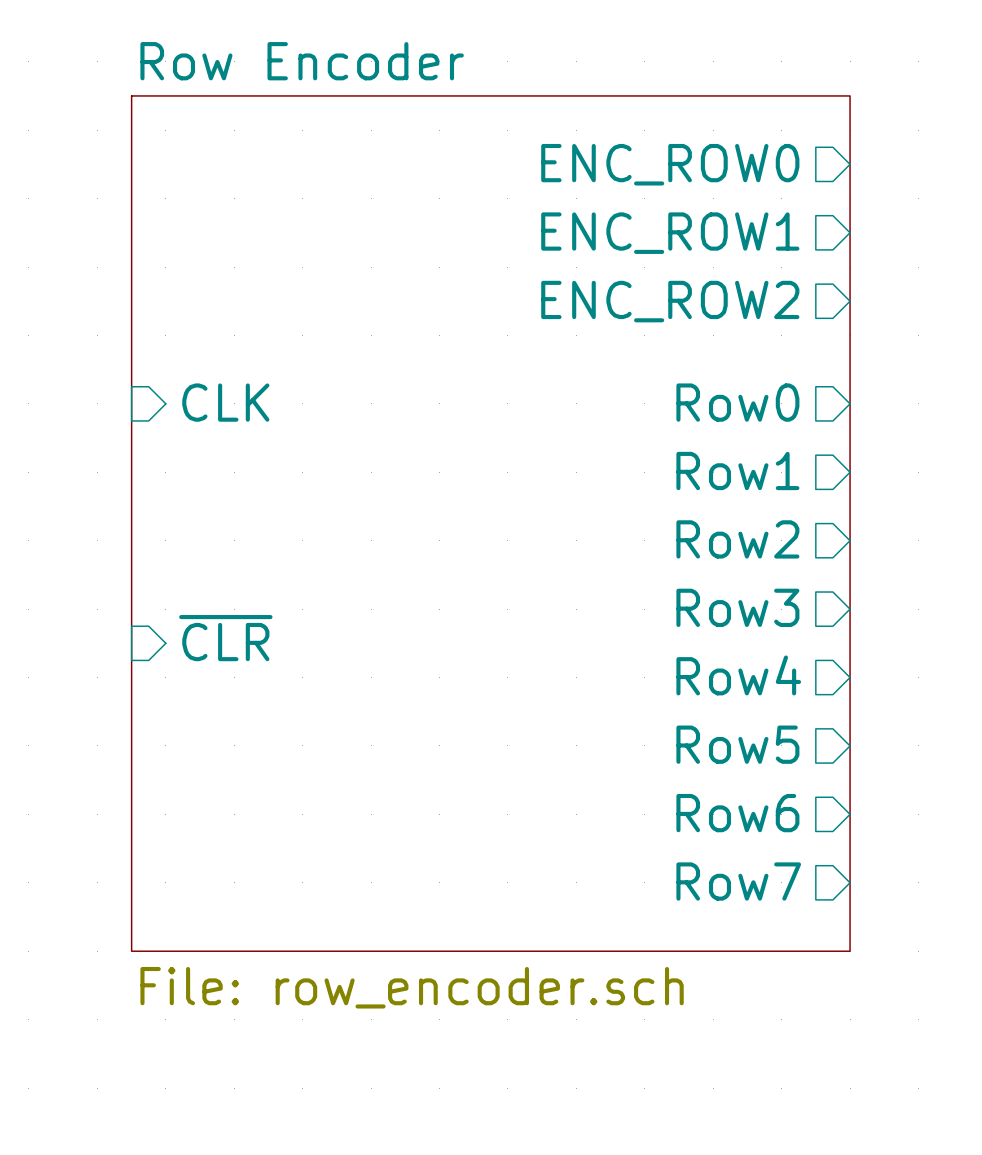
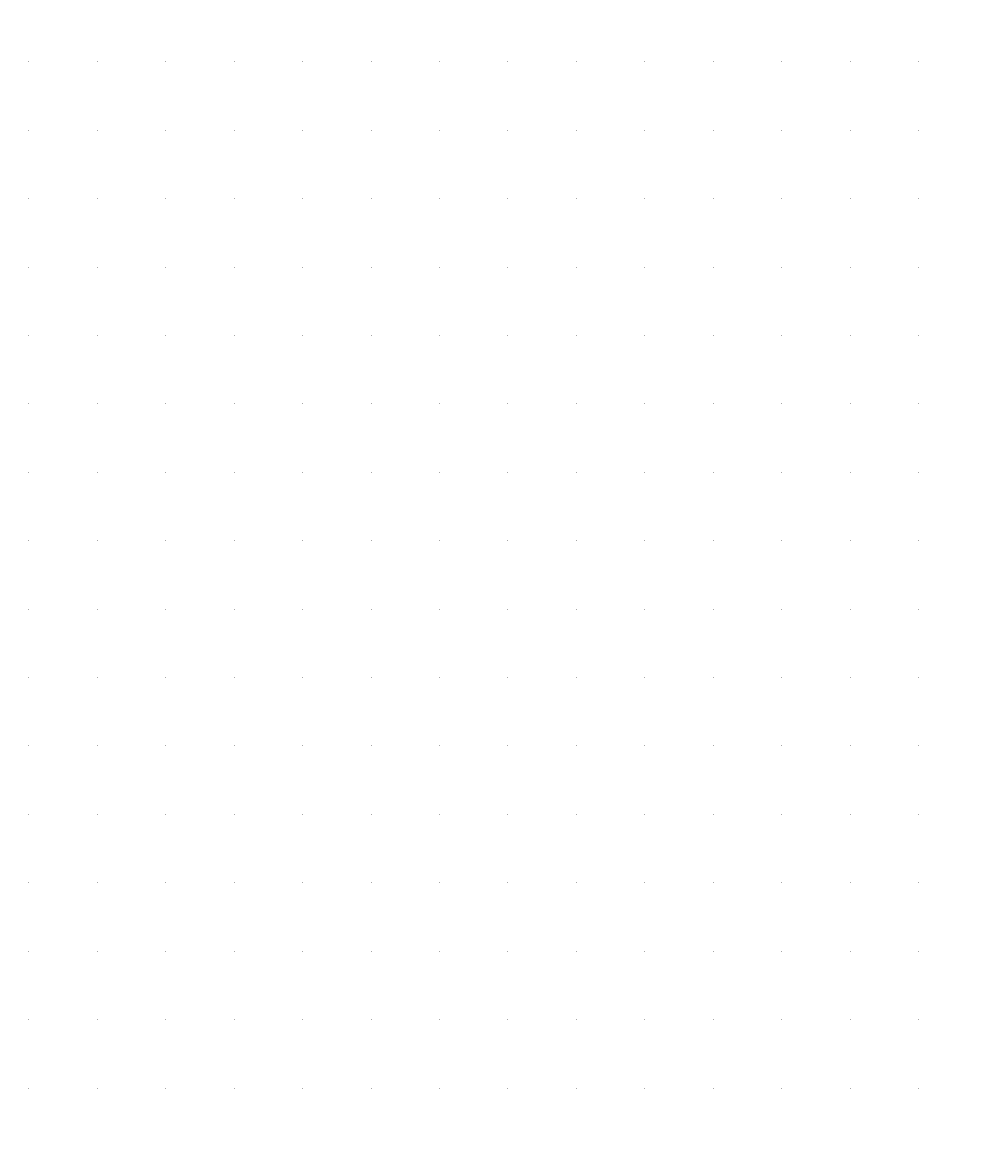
sheet pin: ENC_ROW0 (670, 164) -> none
sheet pin: ENC_ROW1 (670, 233) -> none
sheet pin: ENC_ROW2 (670, 301) -> none
sheet pin: CLK (225, 402) -> none
sheet pin: Row0 (737, 402) -> none
sheet pin: Row1 (737, 471) -> none
sheet Row Encoder: File: row_encoder.sch (490, 523) -> none
sheet pin: Row2 (737, 539) -> none
sheet pin: Row3 (737, 607) -> none
sheet pin: ~{CLR} (225, 638) -> none
sheet pin: Row4 (738, 675) -> none
sheet pin: Row5 (737, 744) -> none
sheet pin: Row6 (737, 813) -> none
sheet pin: Row7 (738, 881) -> none

